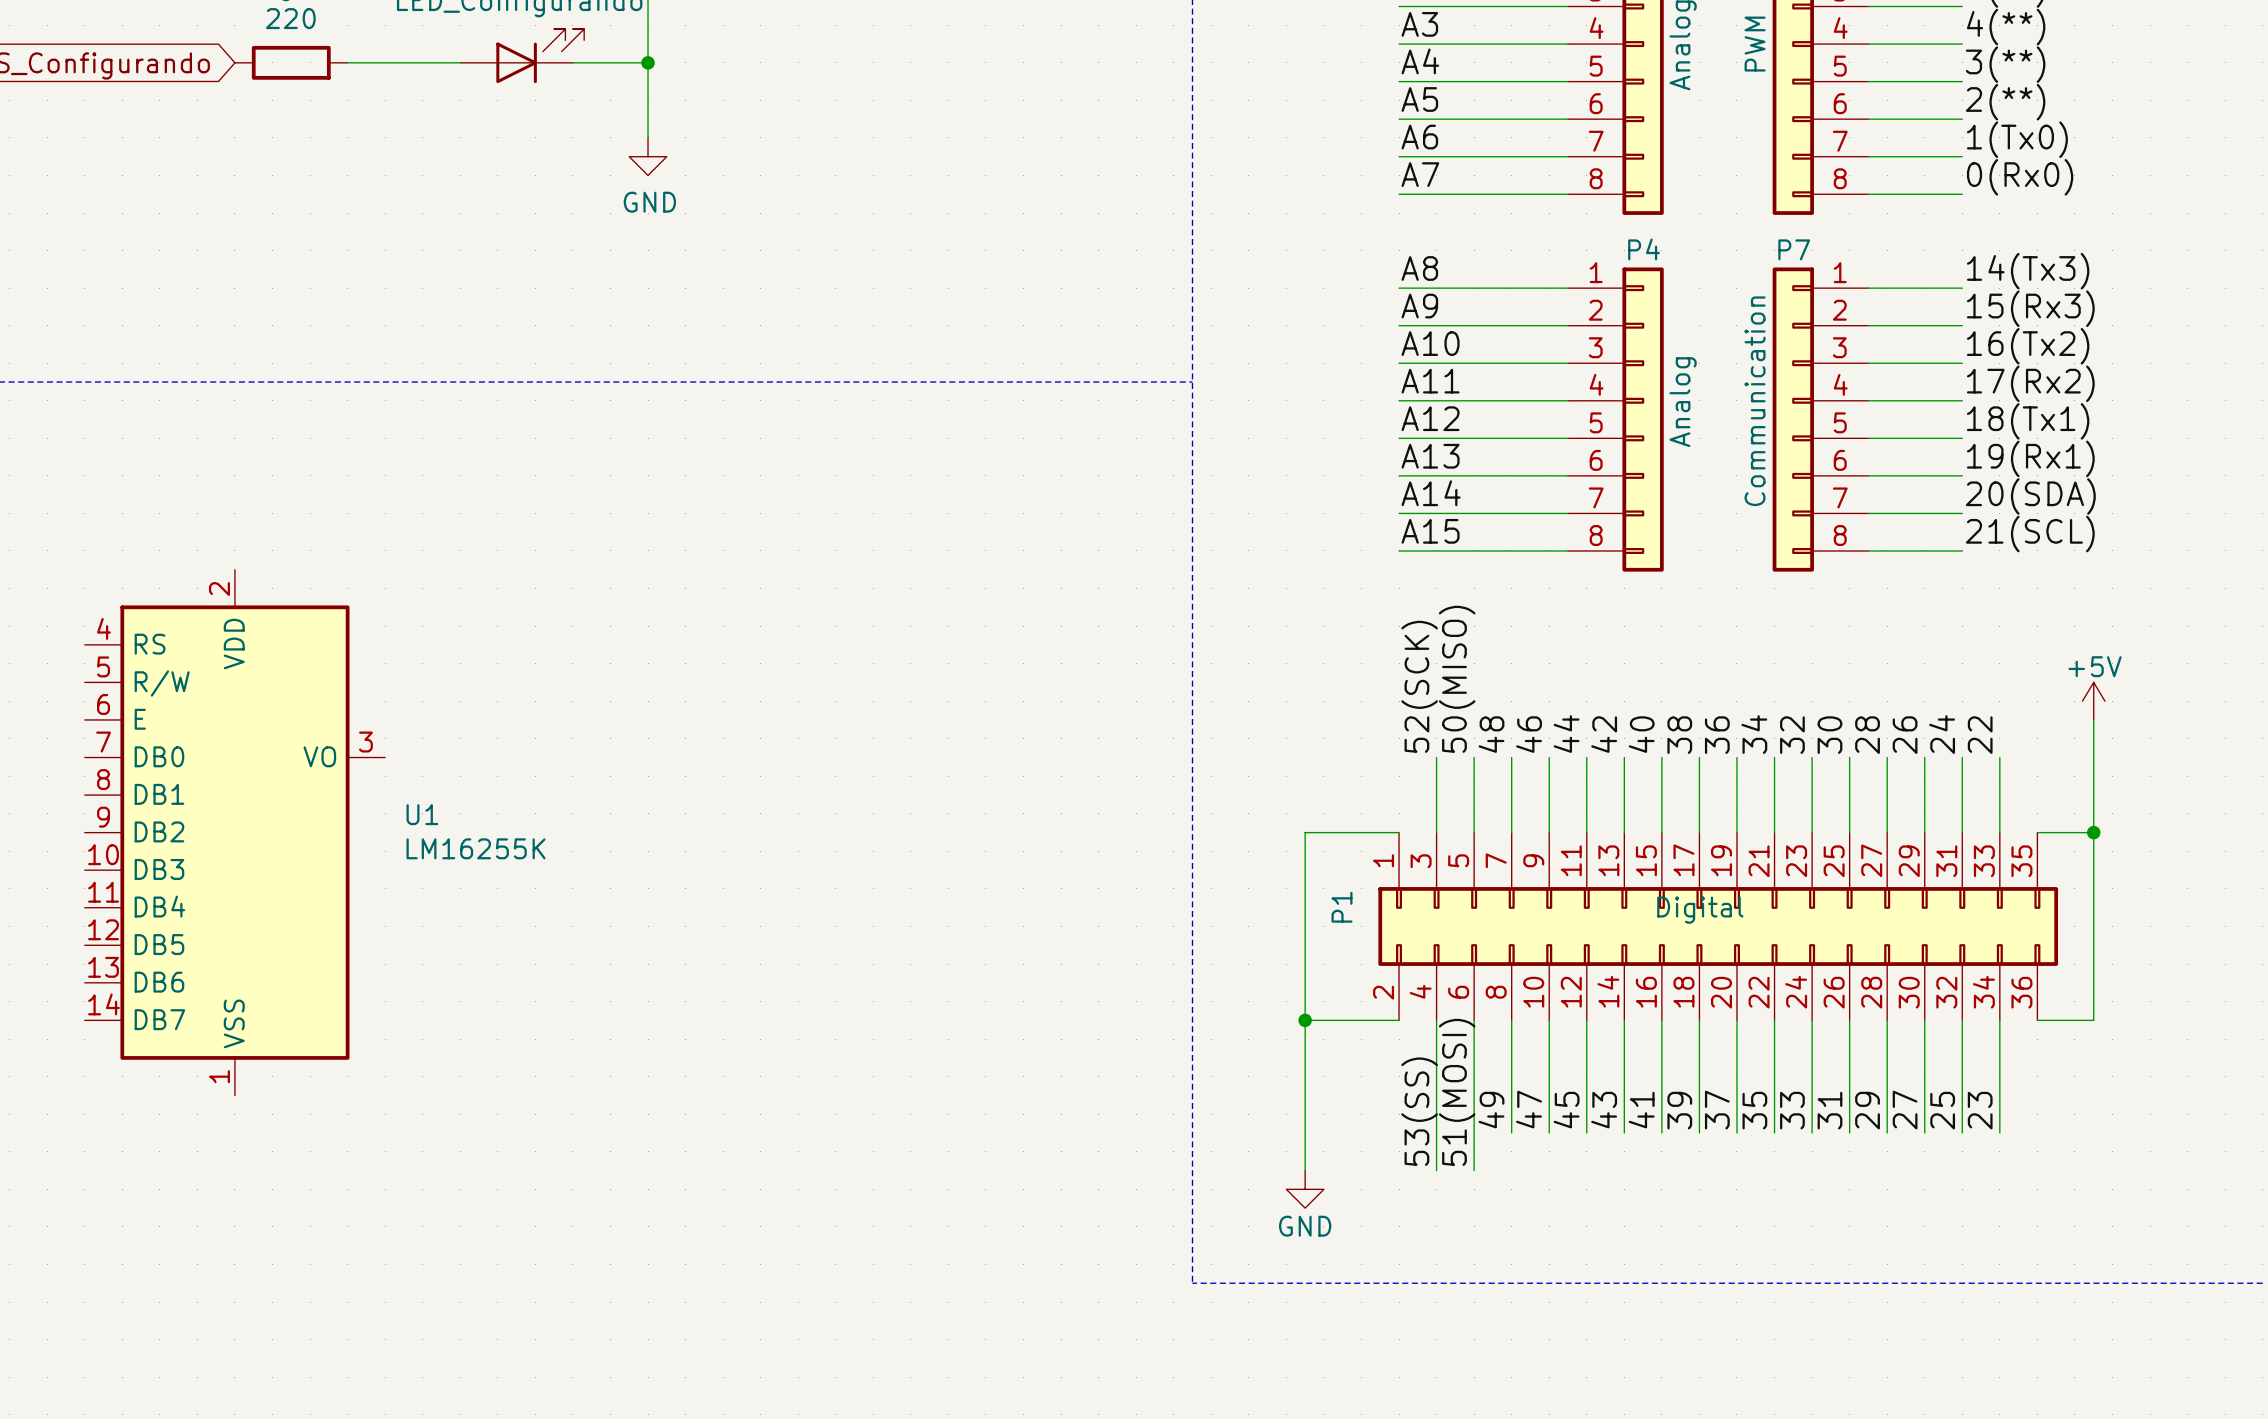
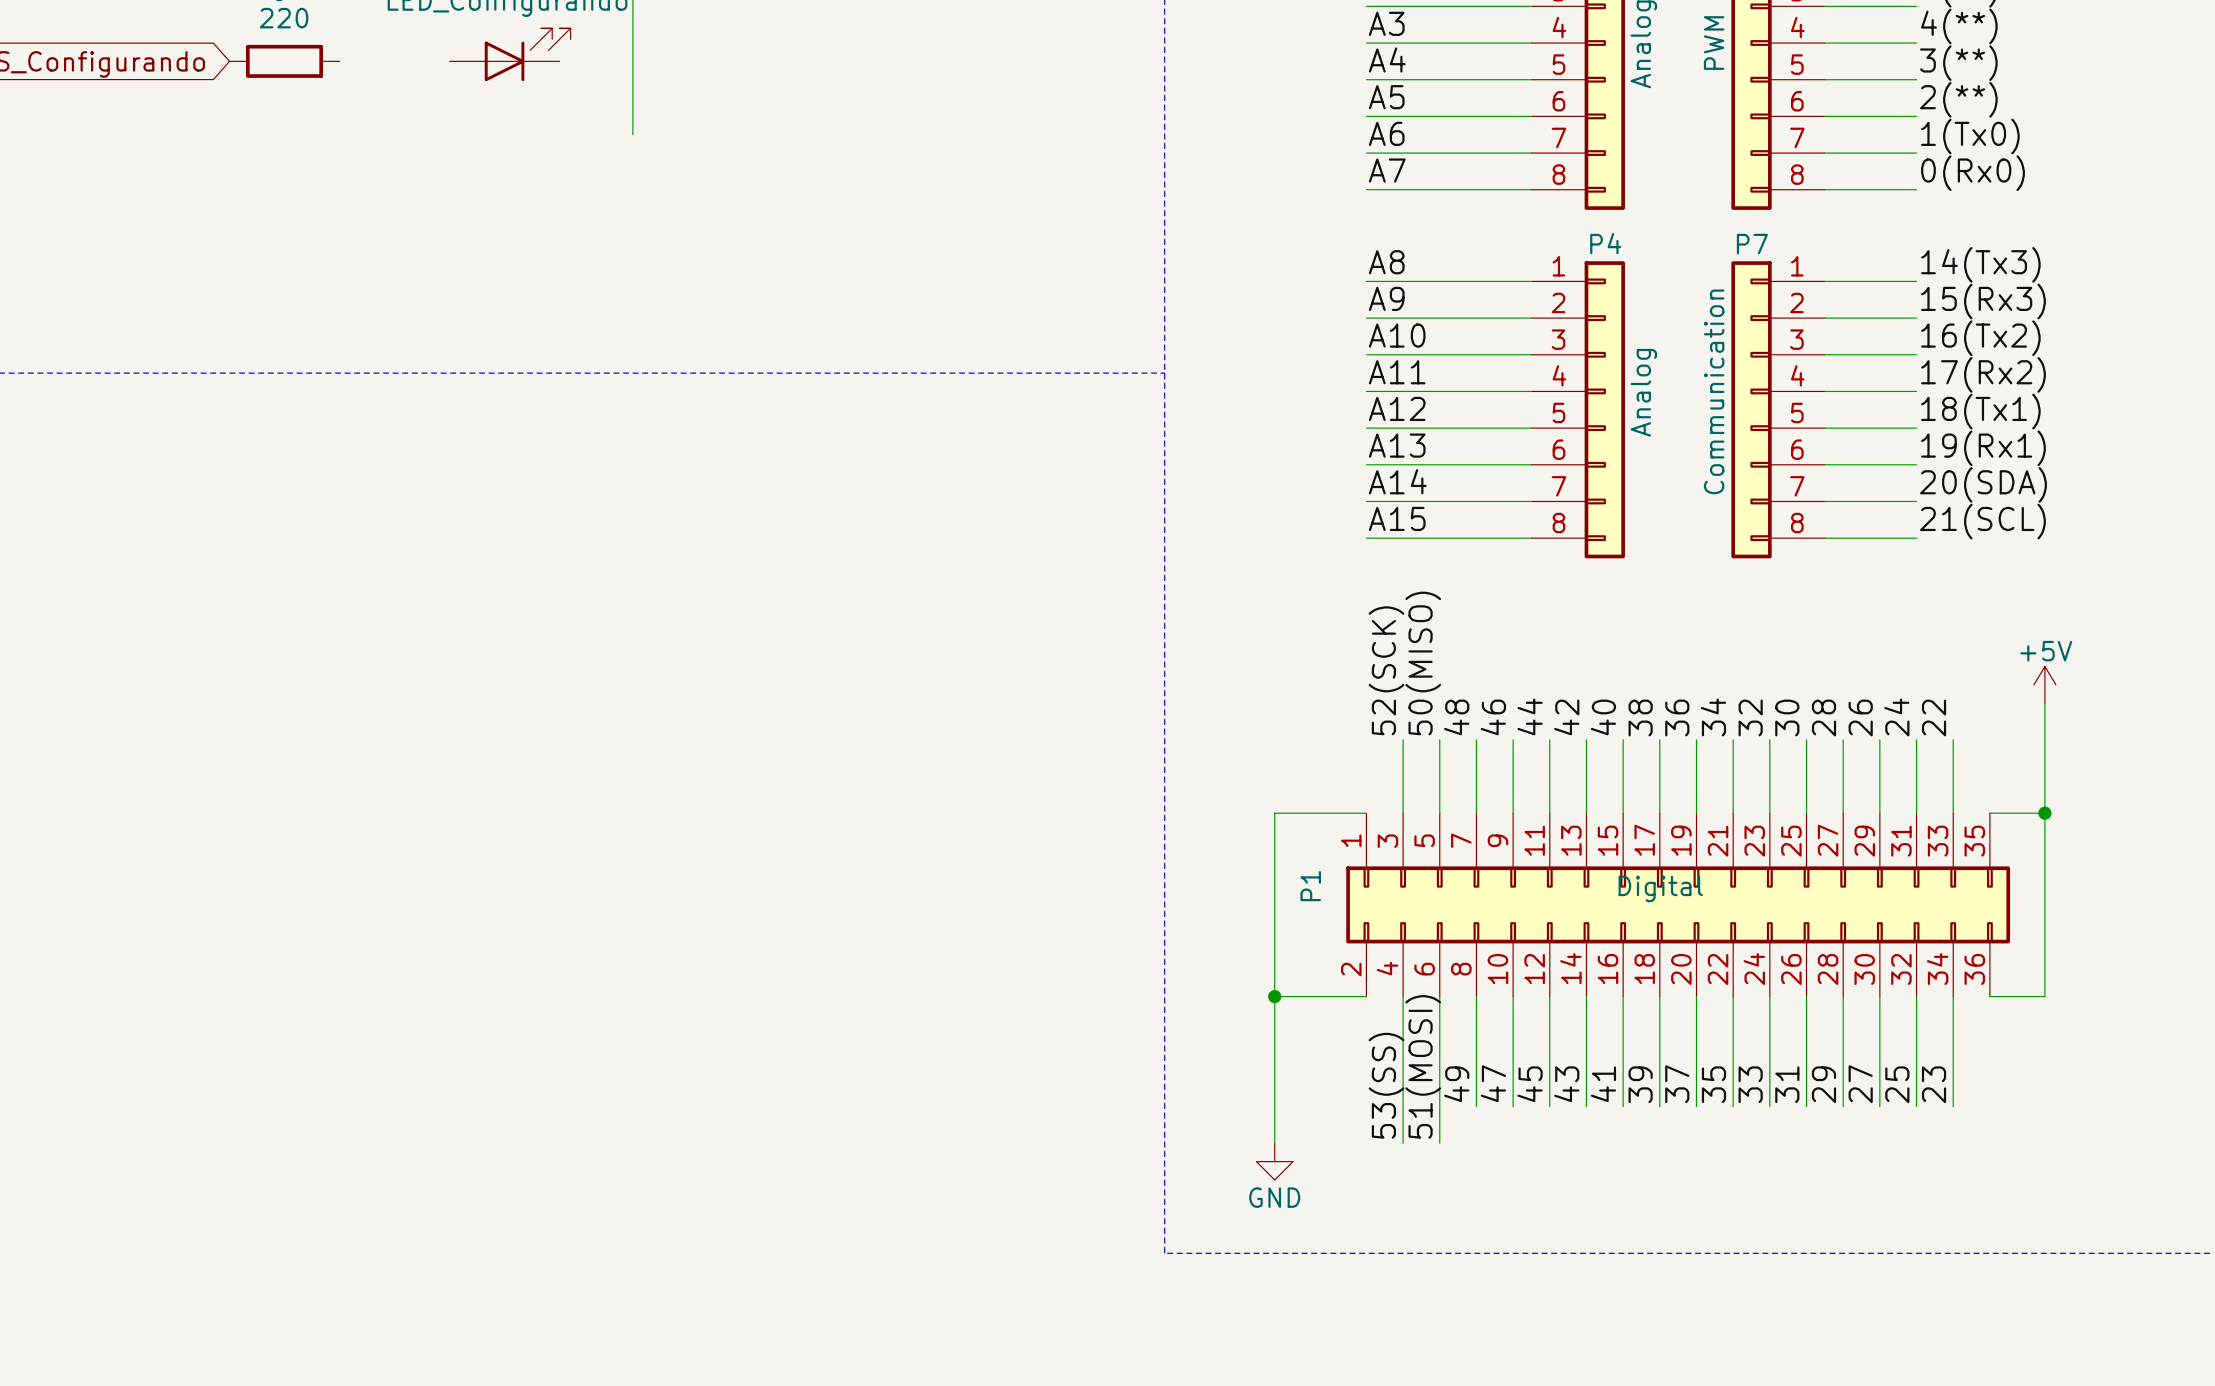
wire: (347, 62) (460, 62) -> none
wire: (572, 62) (648, 62) -> none
junction: (648, 62) -> none
power symbol: GND (648, 156) -> none
U1: LM16255K (234, 832) -> none

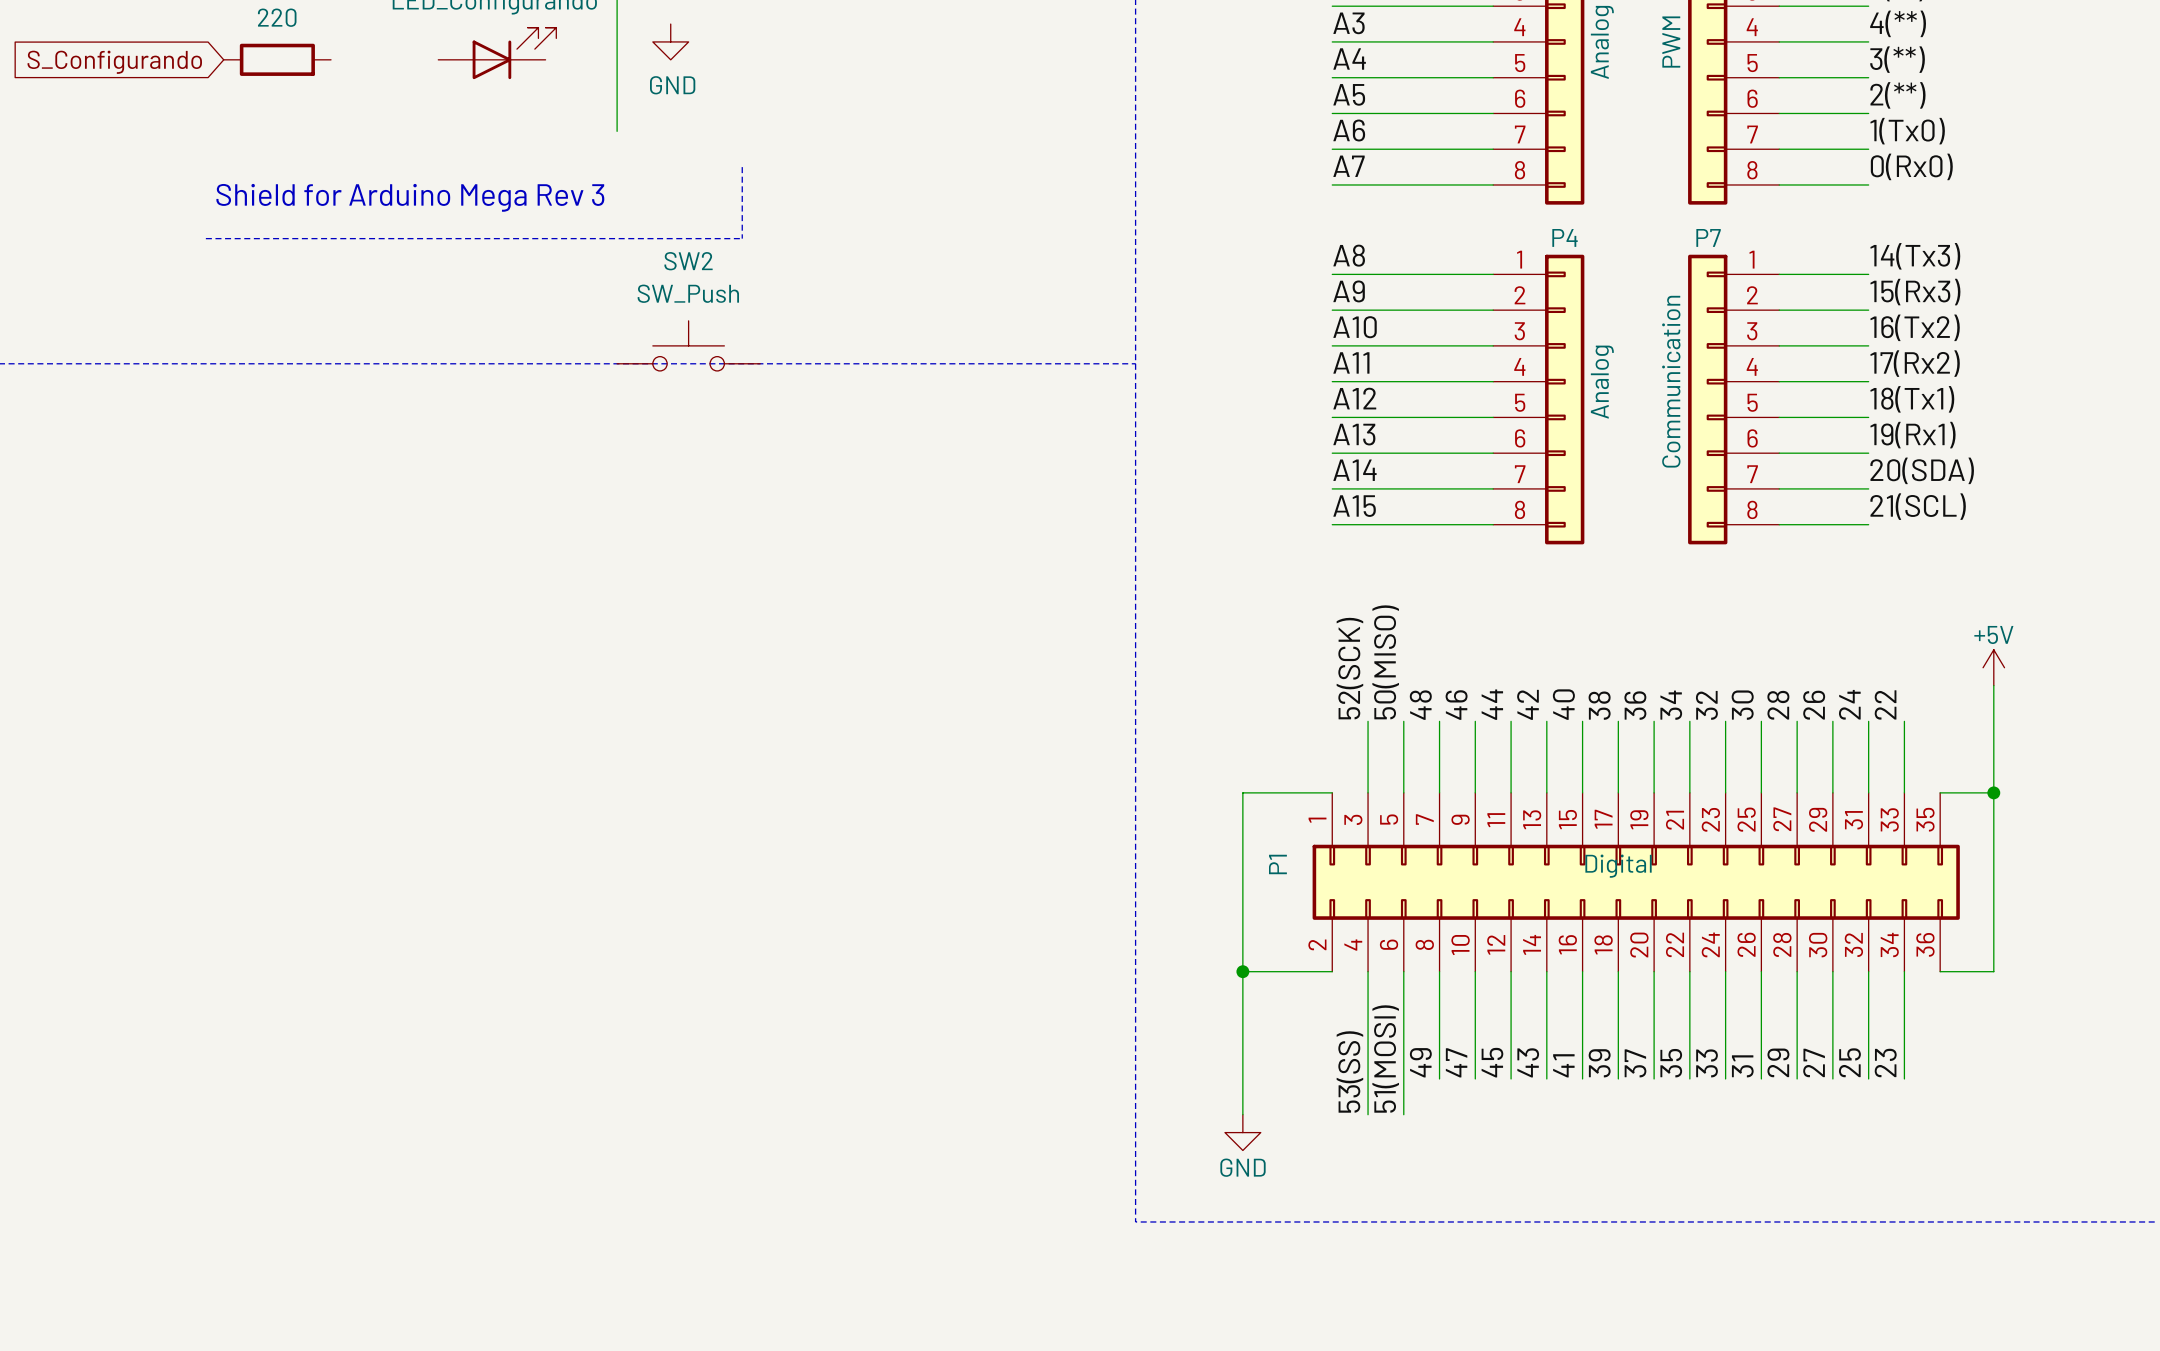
power symbol: none -> GND (670, 41)
line: none -> (742, 167) (742, 238) (205, 238)
text: none -> Shield for Arduino Mega Rev 3 (410, 197)
SW2: none -> SW_Push (688, 345)

